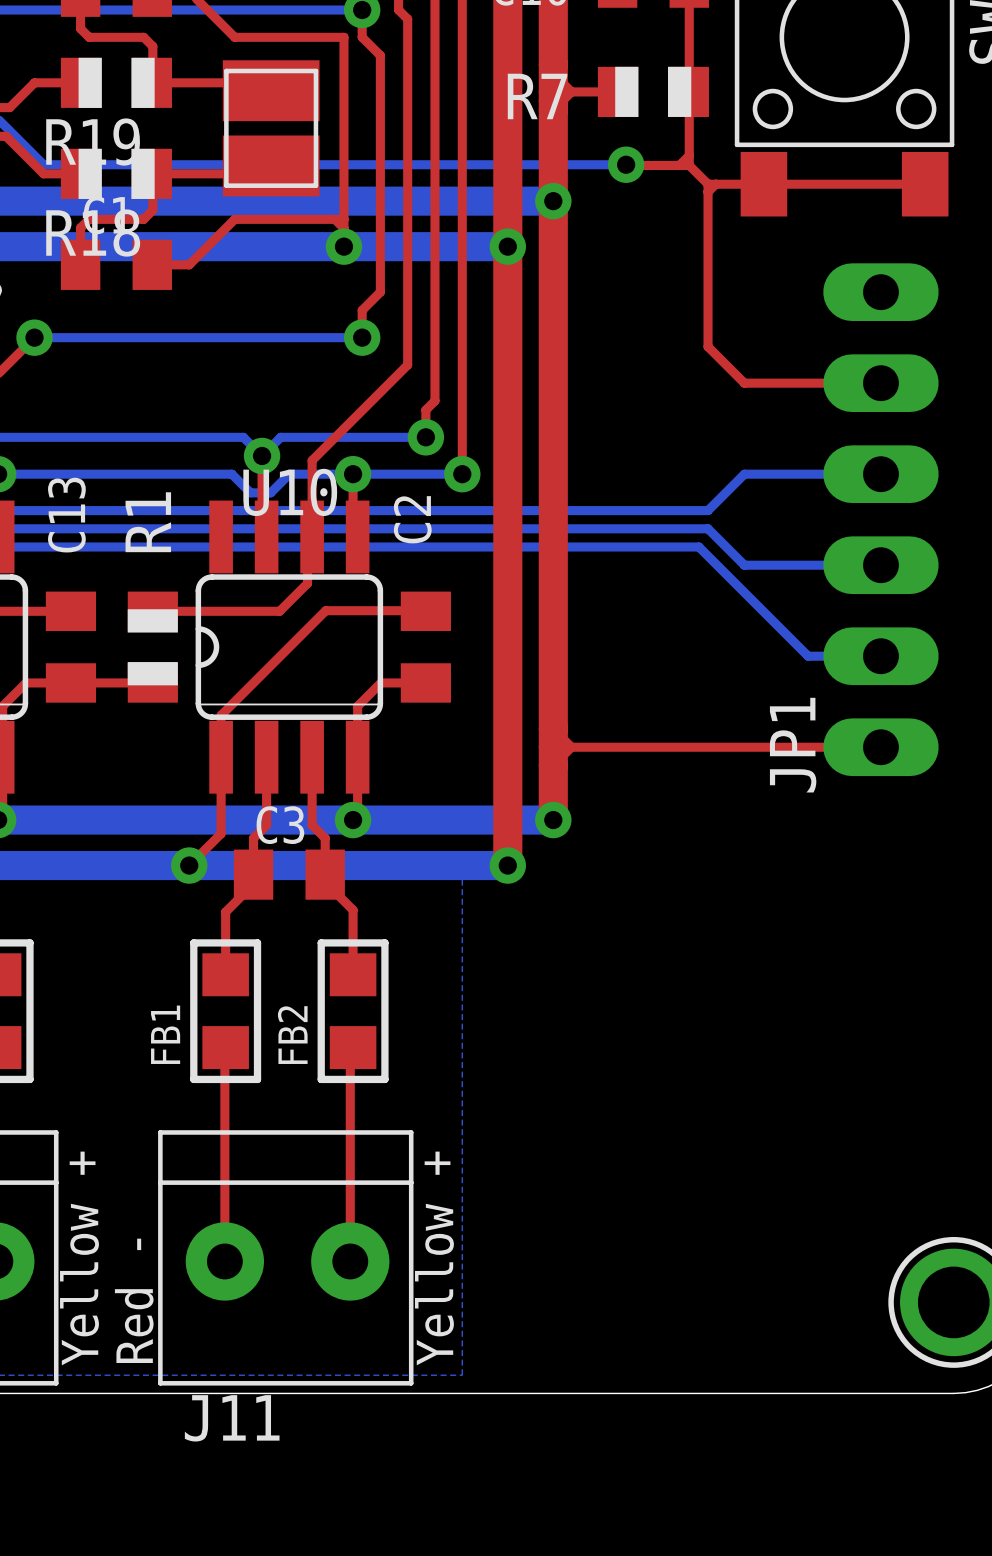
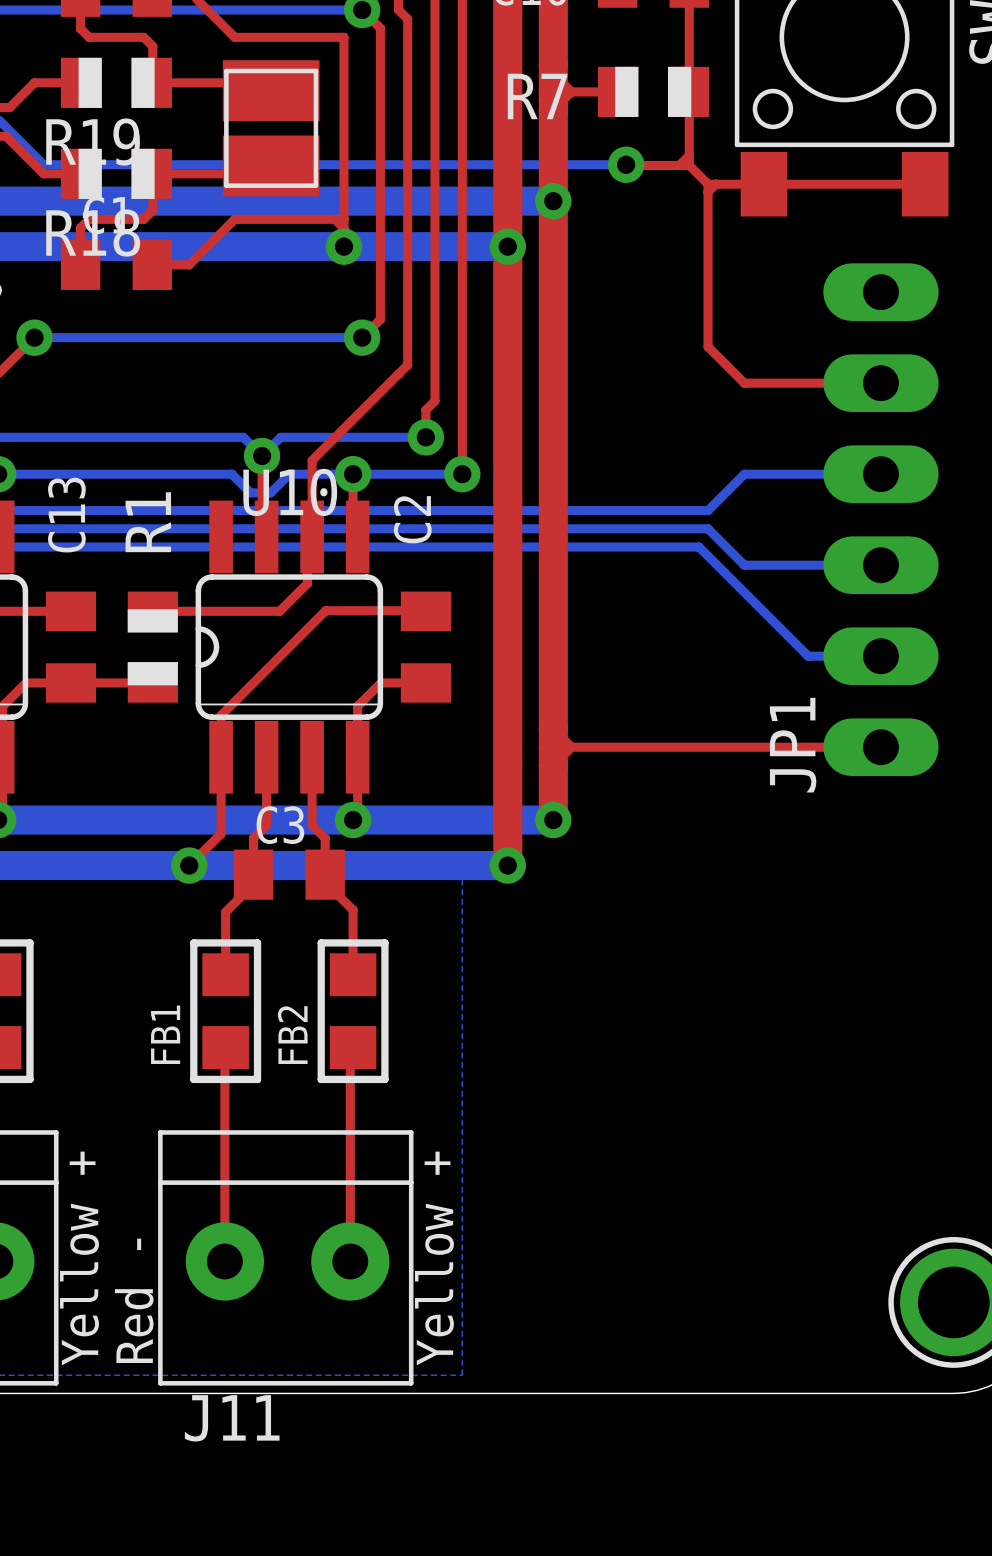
top track: (362, 10) (362, 37) (380, 55) -> (362, 10) (380, 28) (380, 55)
top track: (380, 292) (362, 310) (362, 337) -> (380, 292) (380, 319) (362, 337)

